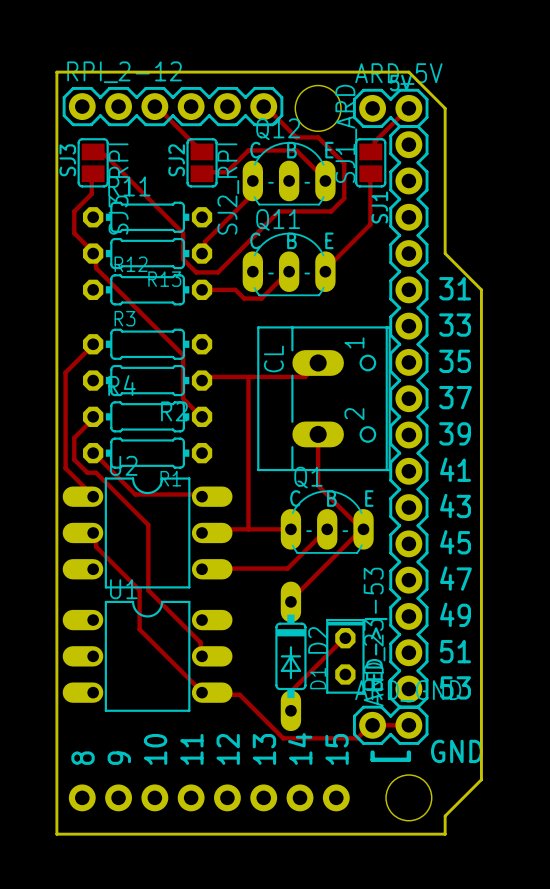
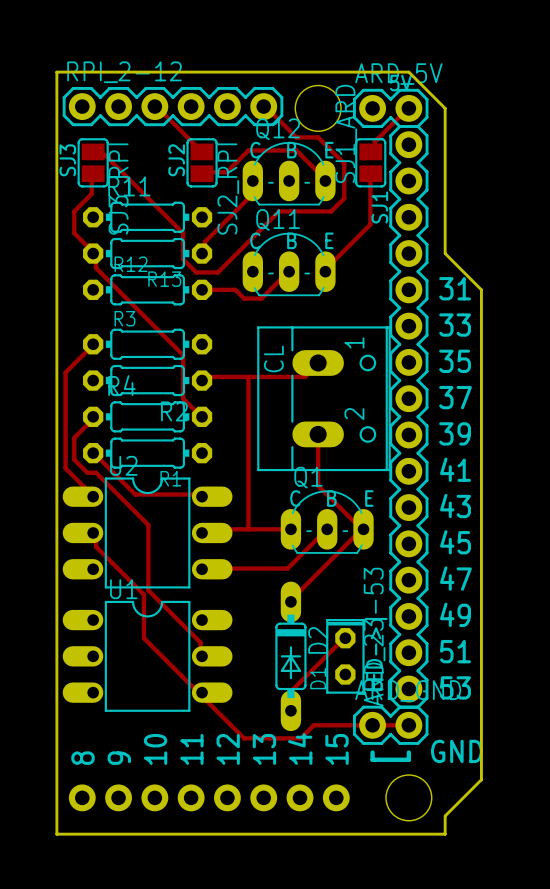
track: (139, 590) (139, 629) (202, 692) (204, 694) (239, 694) (283, 738) -> (139, 590) (143, 594) (143, 638) (244, 738) (283, 738)
track: (370, 725) (357, 738) (300, 738) -> (370, 725) (313, 725) (300, 738)

